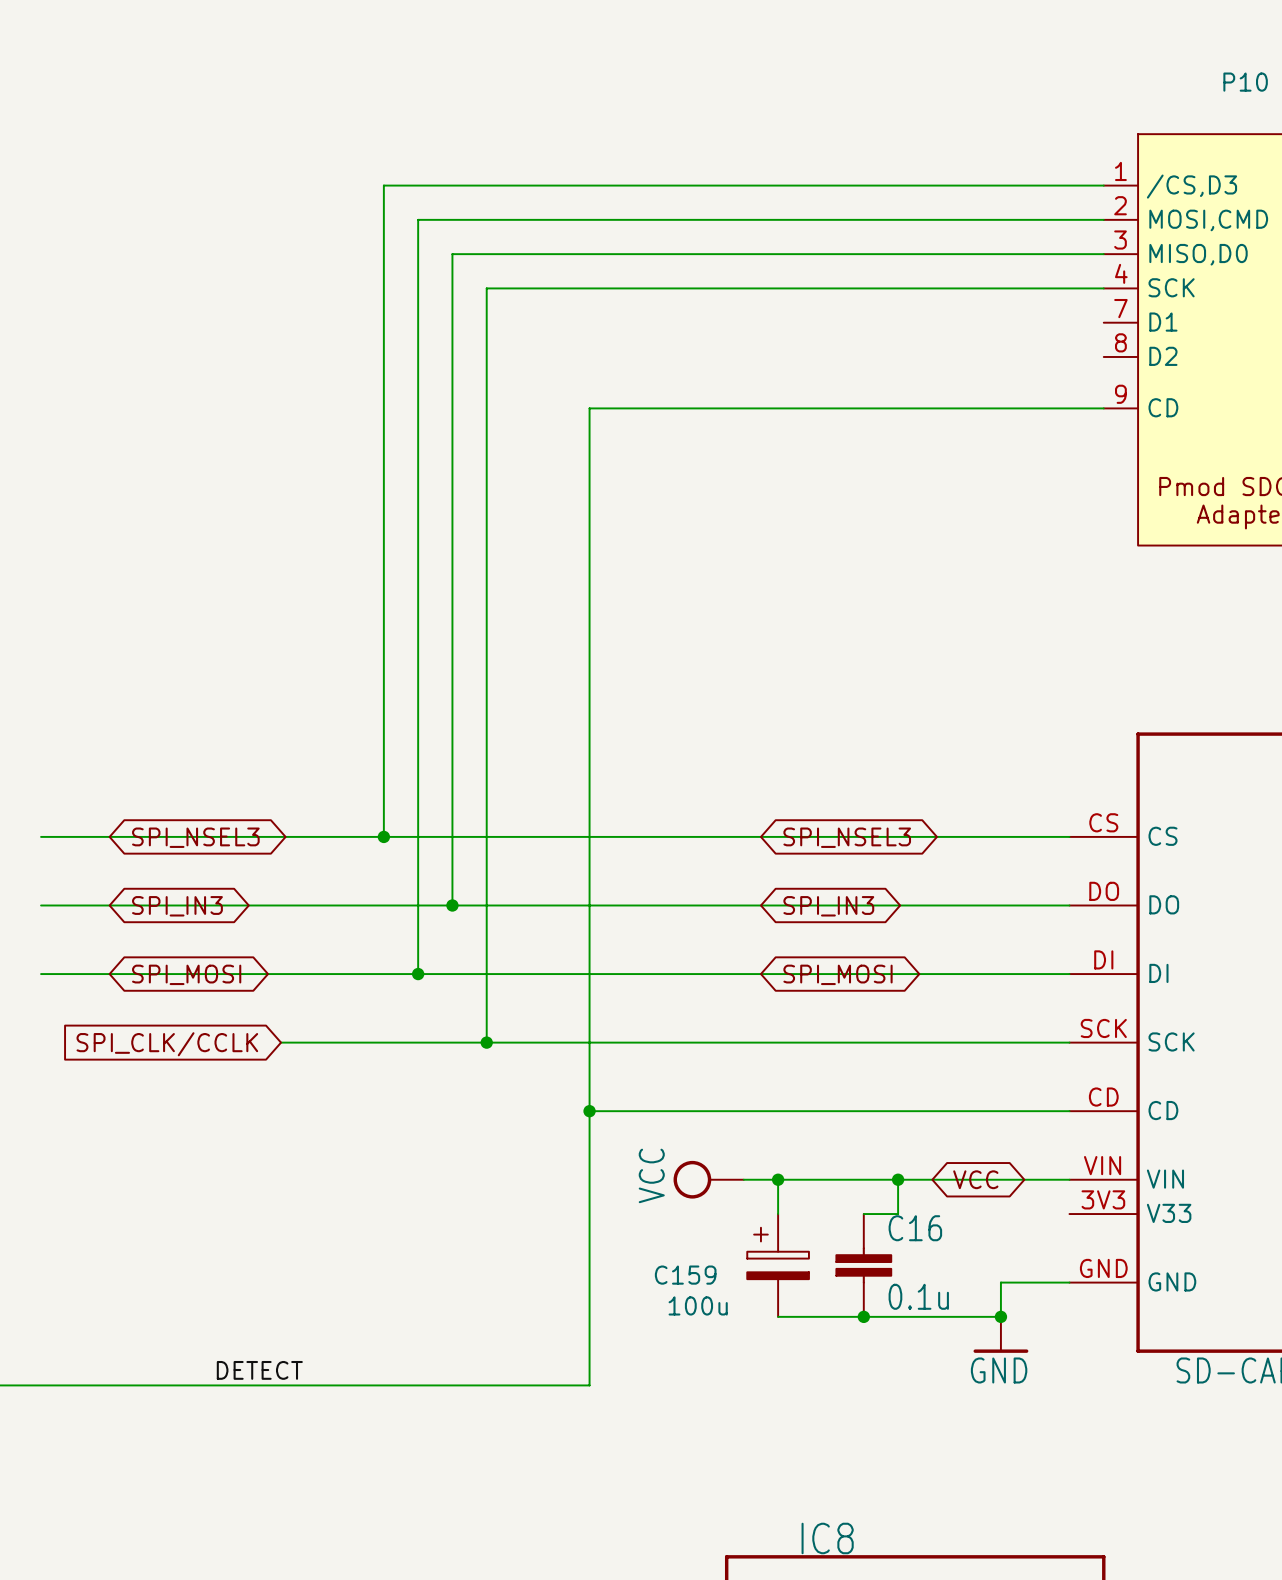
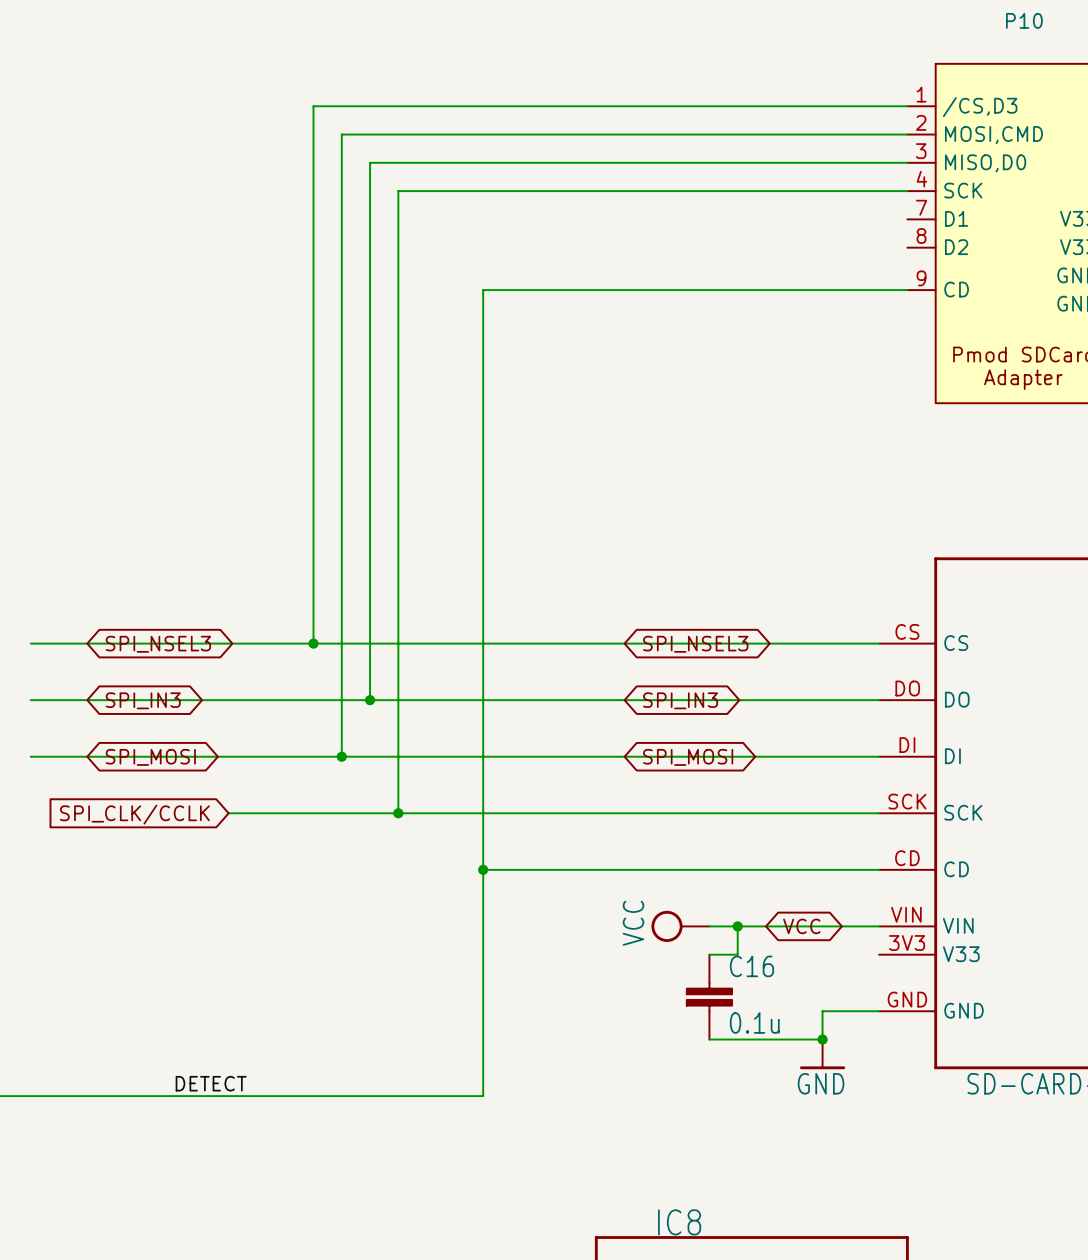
power symbol position: VCC (708, 1179) -> VCC (680, 926)
wire: (743, 1179) (863, 1179) -> none
wire: (778, 1179) (778, 1214) -> none
junction: (778, 1179) -> none
C159: 100u (778, 1265) -> none
wire: (778, 1316) (863, 1316) -> none
junction: (863, 1316) -> none

